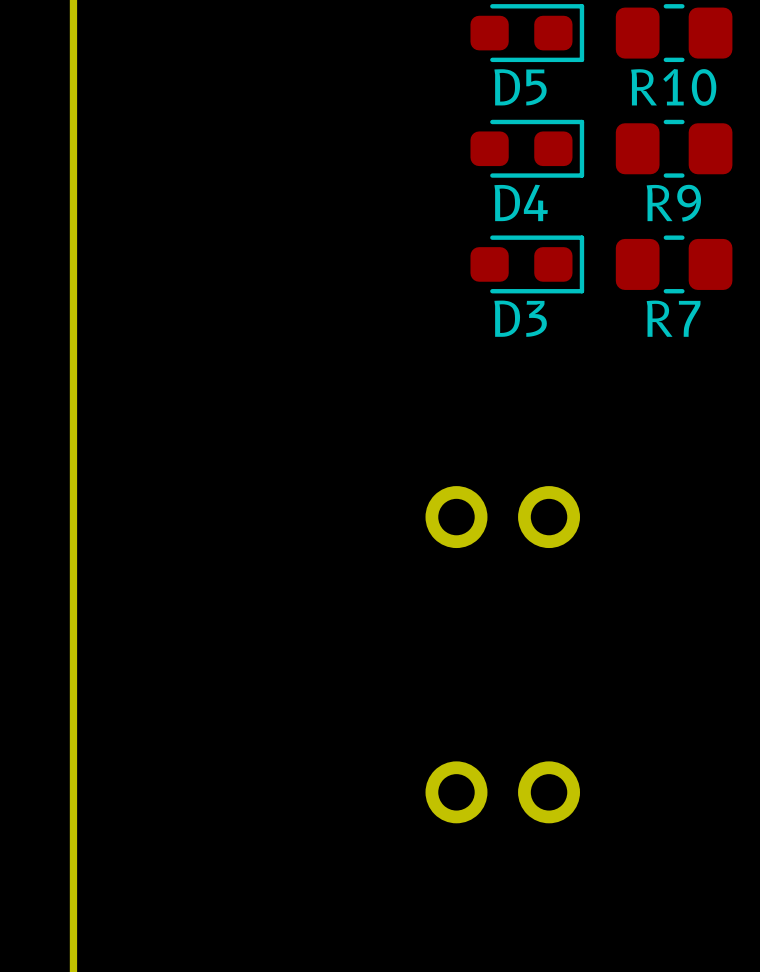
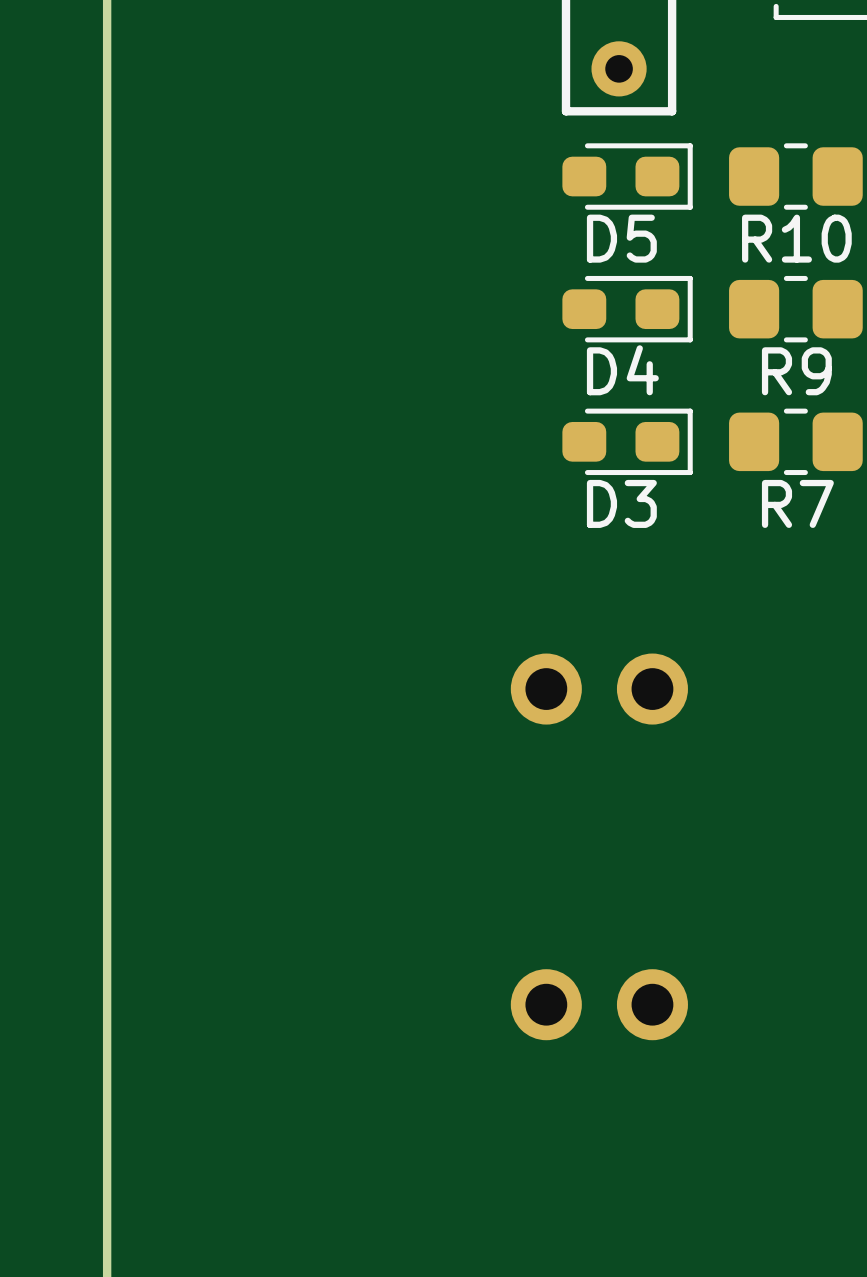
part position: (502, 517) -> (599, 689)
part position: (502, 792) -> (599, 1004)

